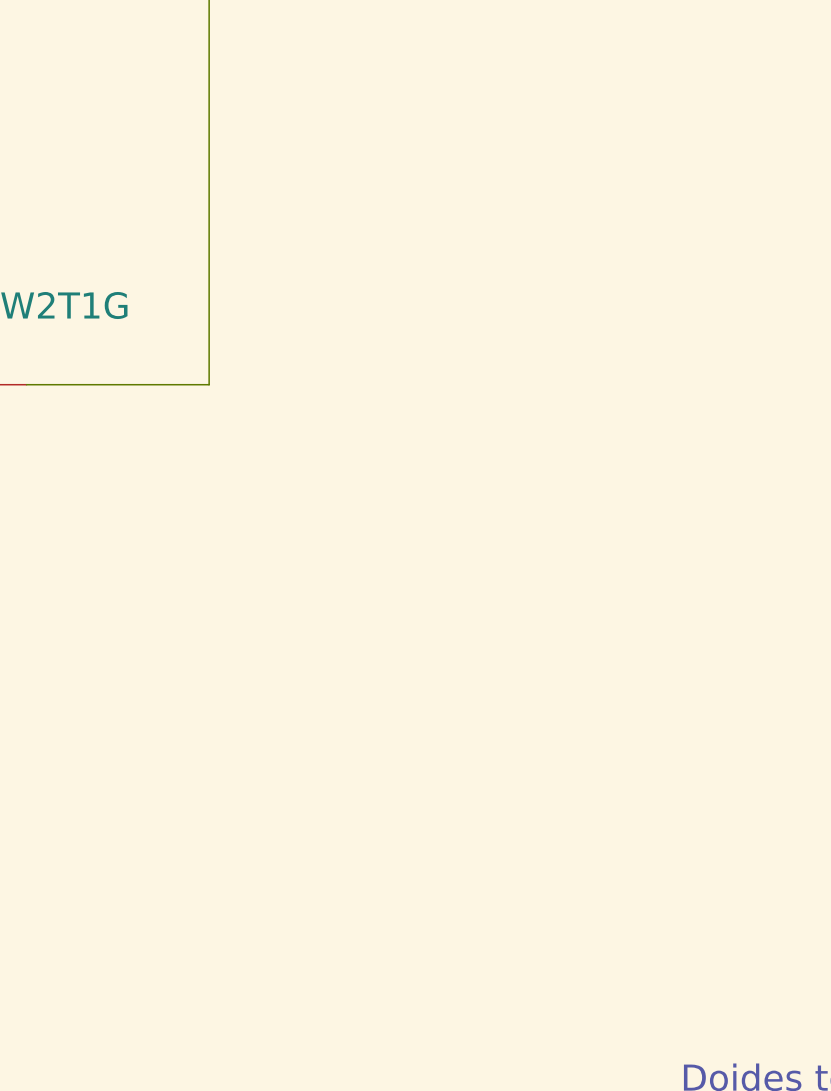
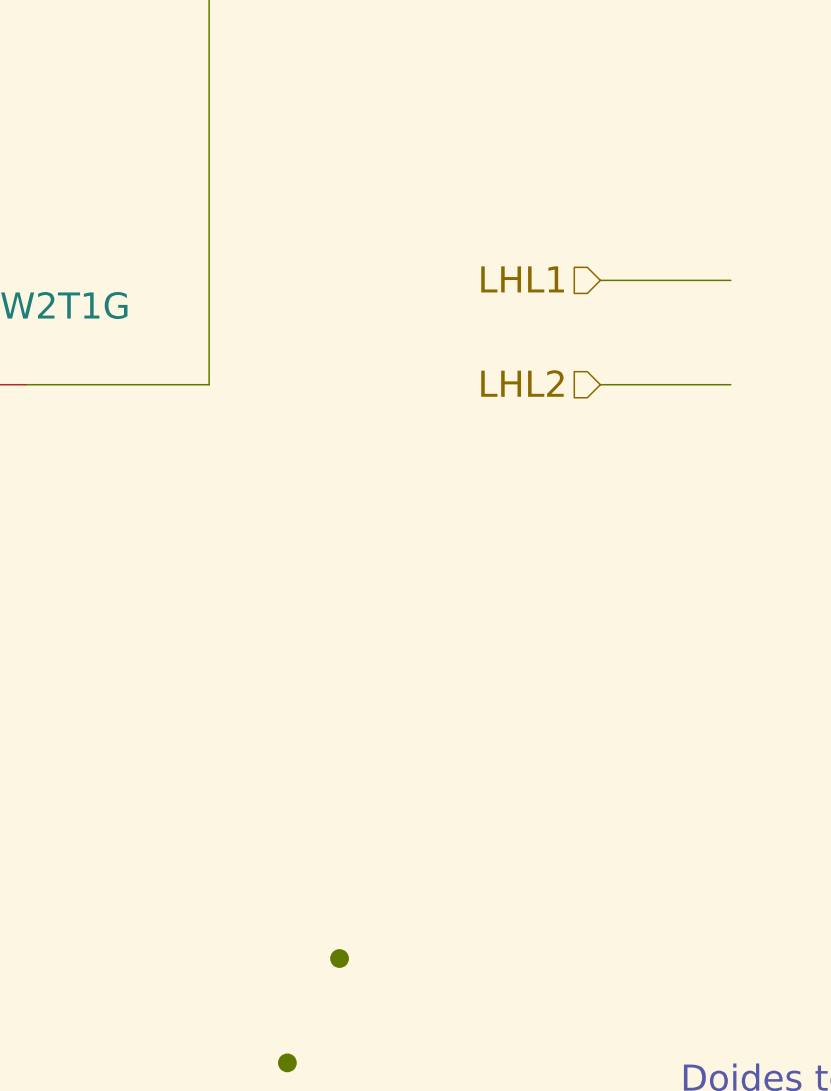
hierarchical label: none -> LHL1 (522, 279)
wire: none -> (600, 280) (730, 280)
hierarchical label: none -> LHL2 (522, 383)
wire: none -> (600, 384) (730, 384)
junction: none -> (339, 958)
junction: none -> (287, 1062)

